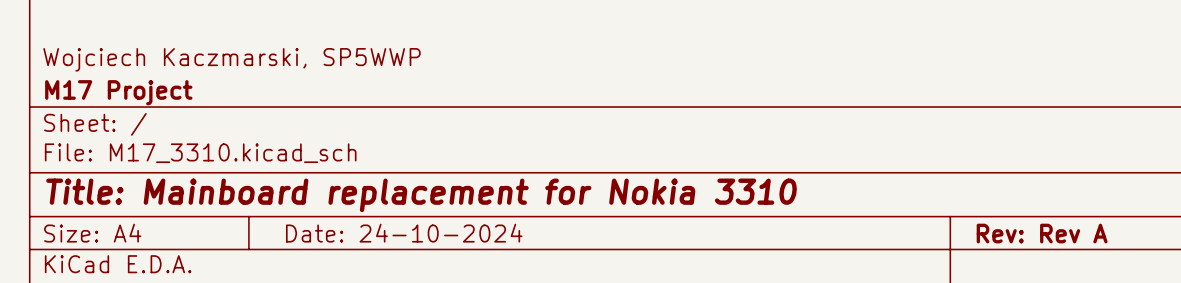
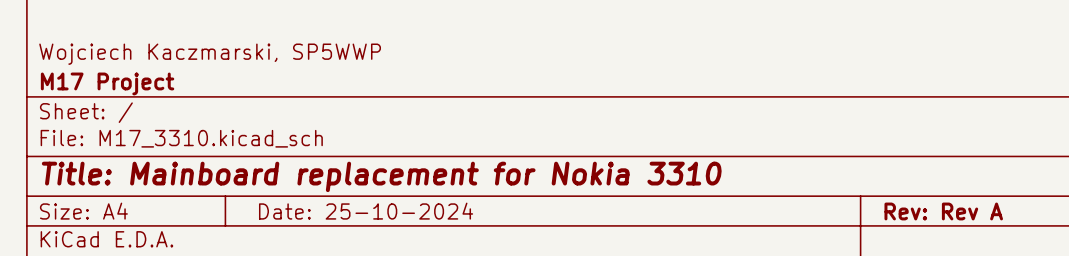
title block: Date: 24-10-2024 (404, 233) -> Date: 25-10-2024 (366, 211)

